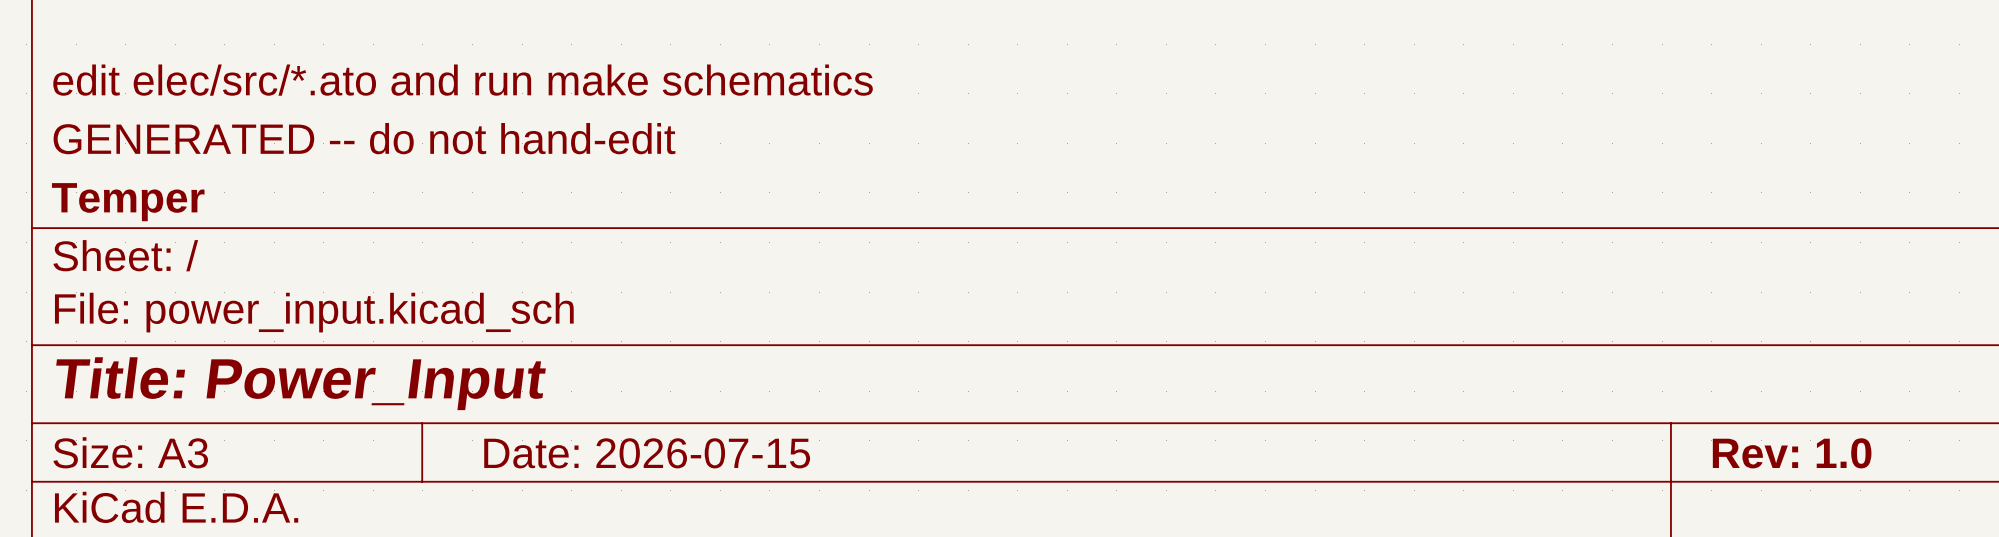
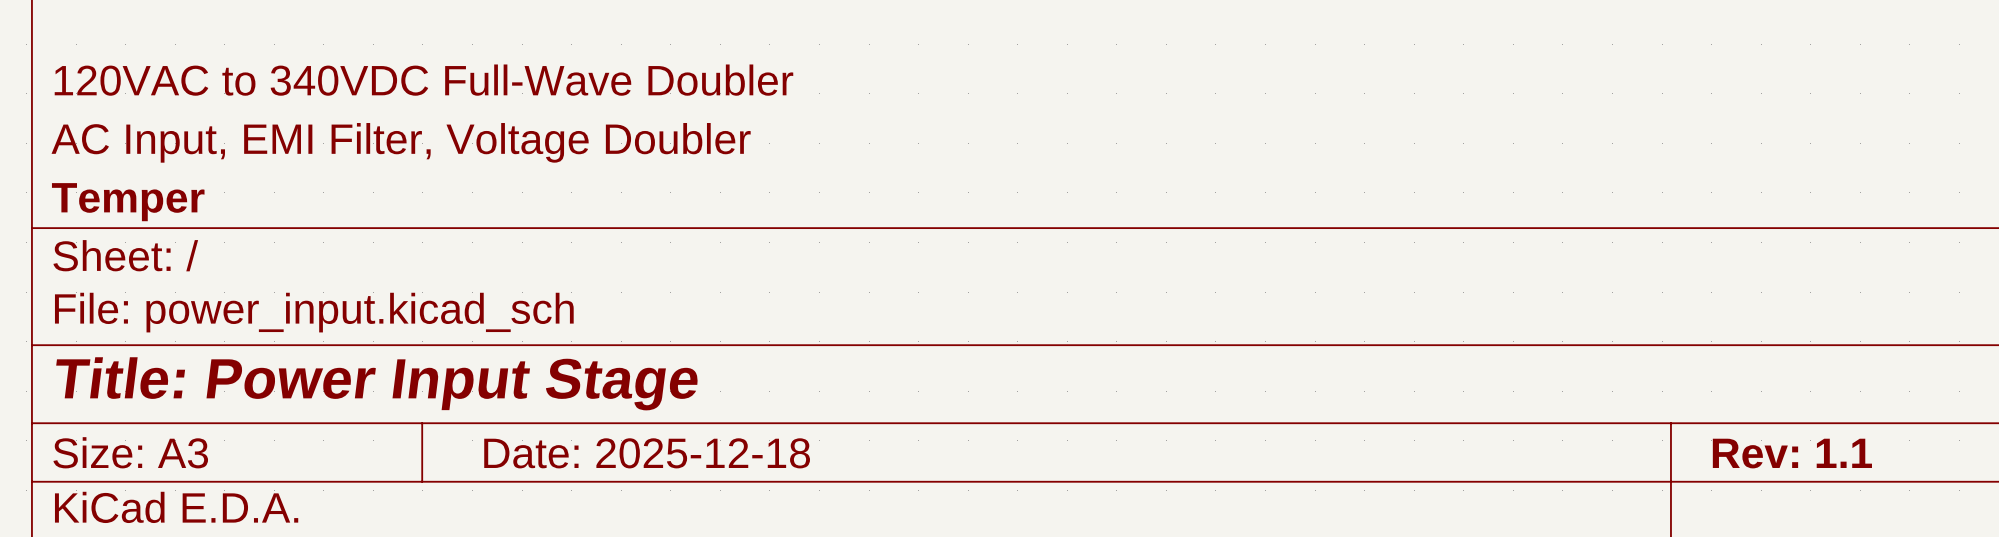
title block: edit elec/src/*.ato and run make schematics (463, 80) -> 120VAC to 340VDC Full-Wave Doubler (423, 80)
title block: GENERATED -- do not hand-edit (364, 138) -> AC Input, EMI Filter, Voltage Doubler (401, 142)
title block: Title: Power_Input (301, 383) -> Title: Power Input Stage (377, 383)
title block: Date: 2026-07-15 (647, 453) -> Date: 2025-12-18 (647, 453)
title block: Rev: 1.0 (1792, 453) -> Rev: 1.1 (1792, 453)

